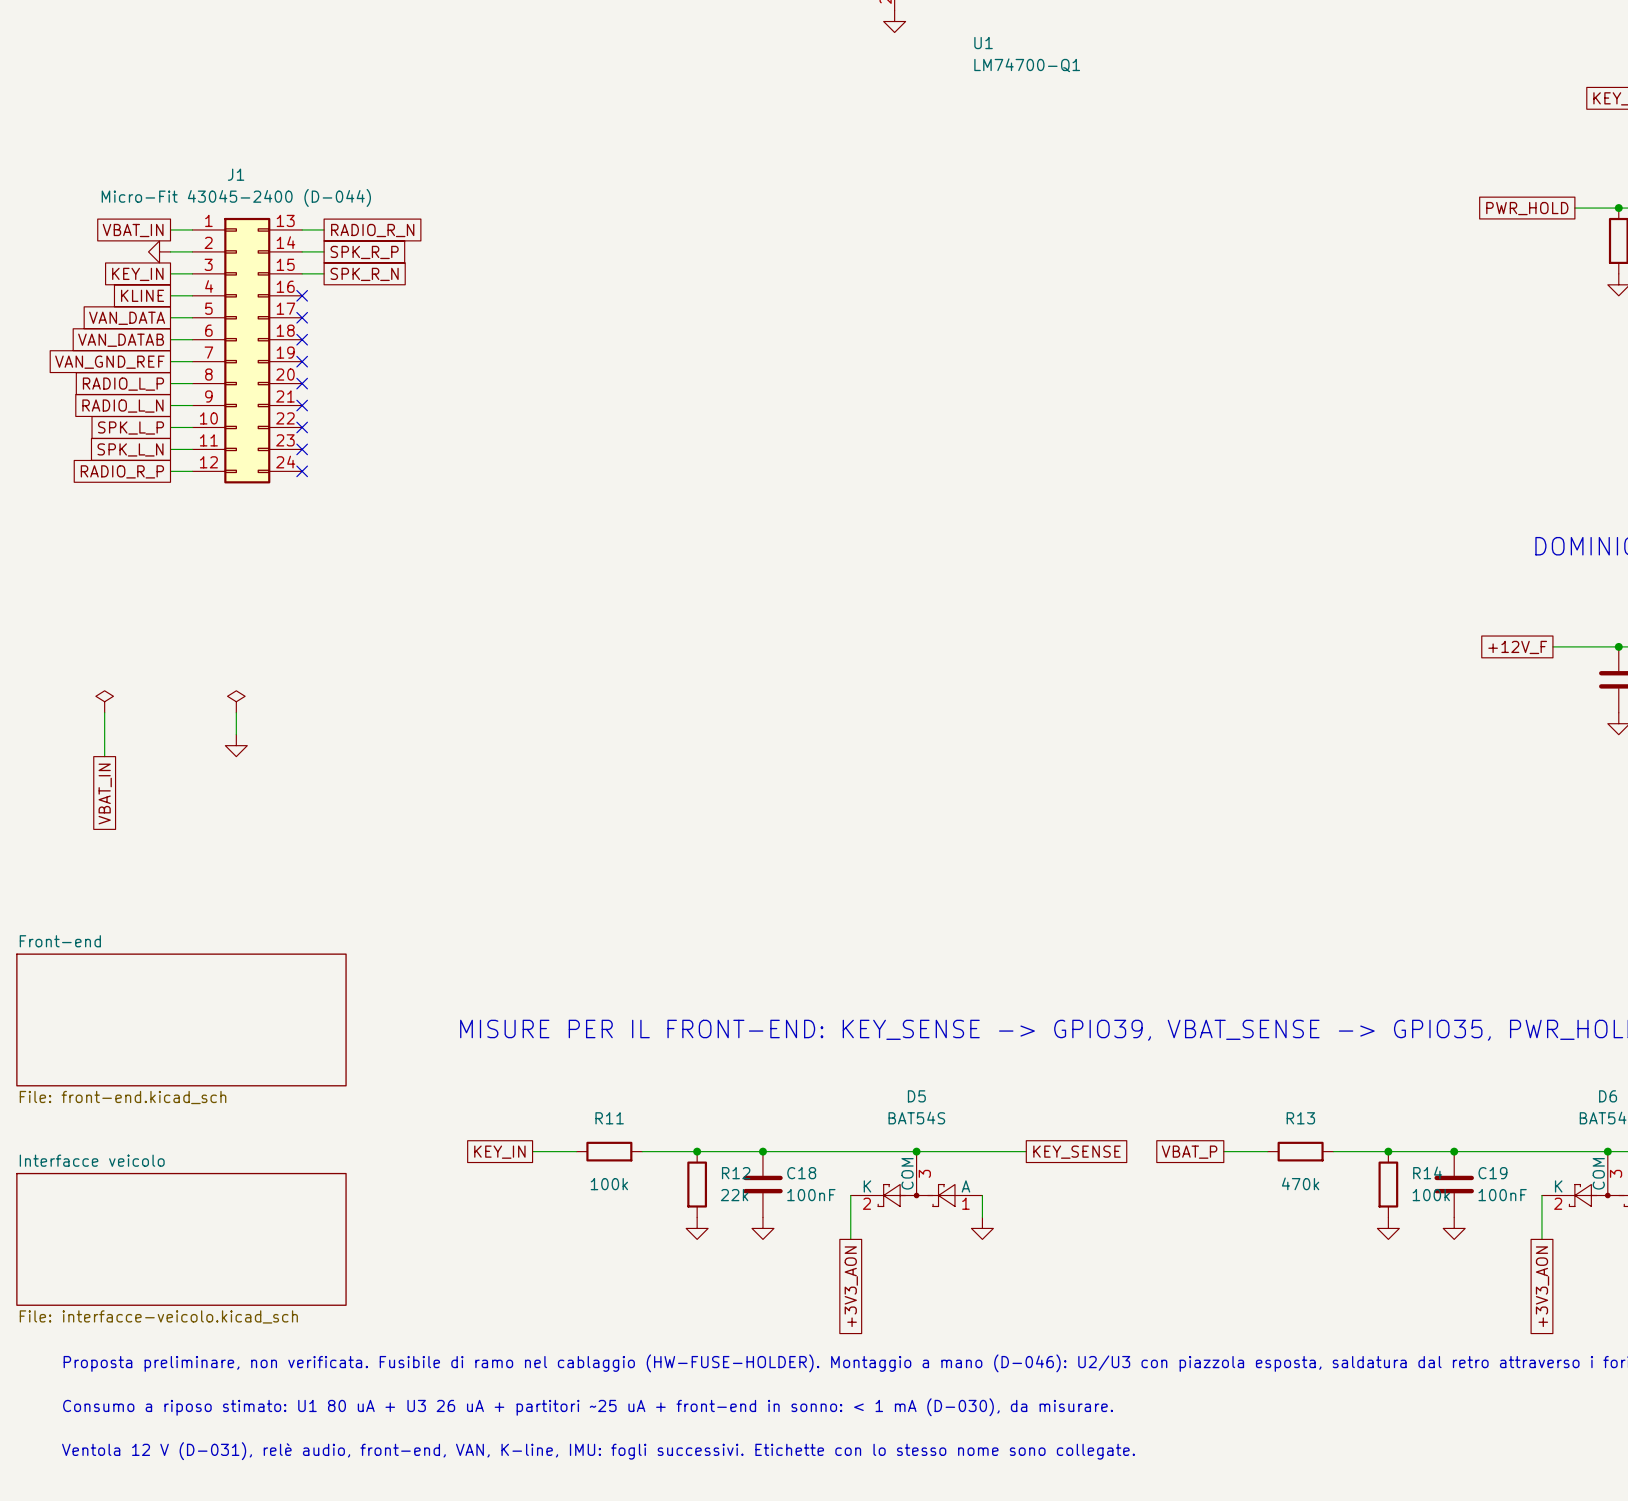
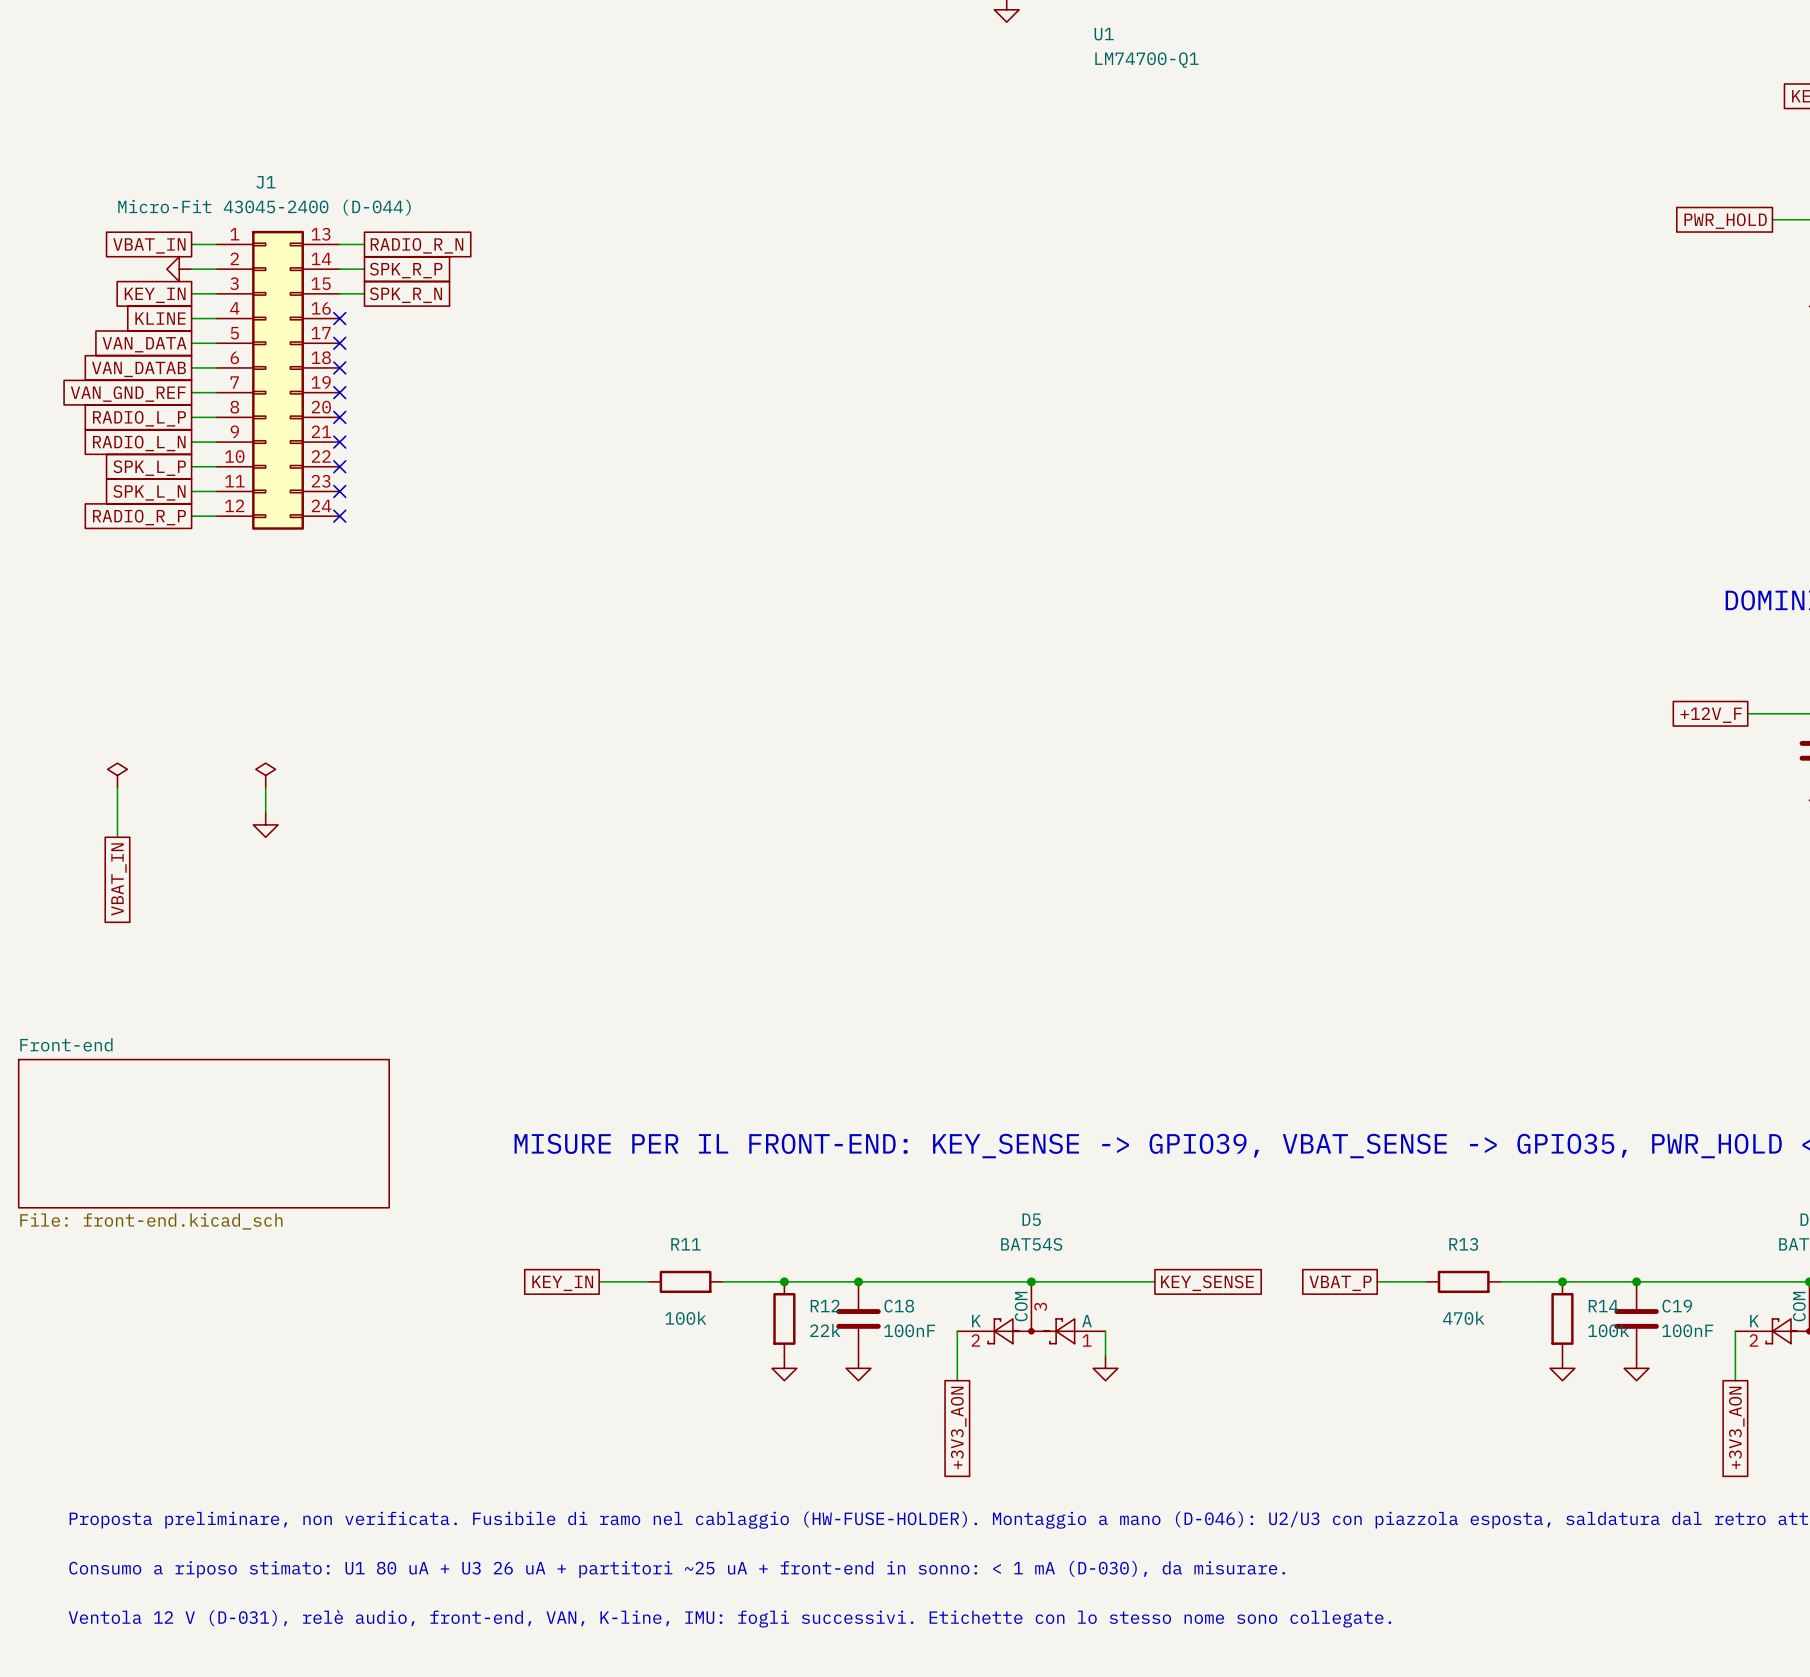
sheet Interfacce veicolo: File: interfacce-veicolo.kicad_sch (181, 1239) -> none

